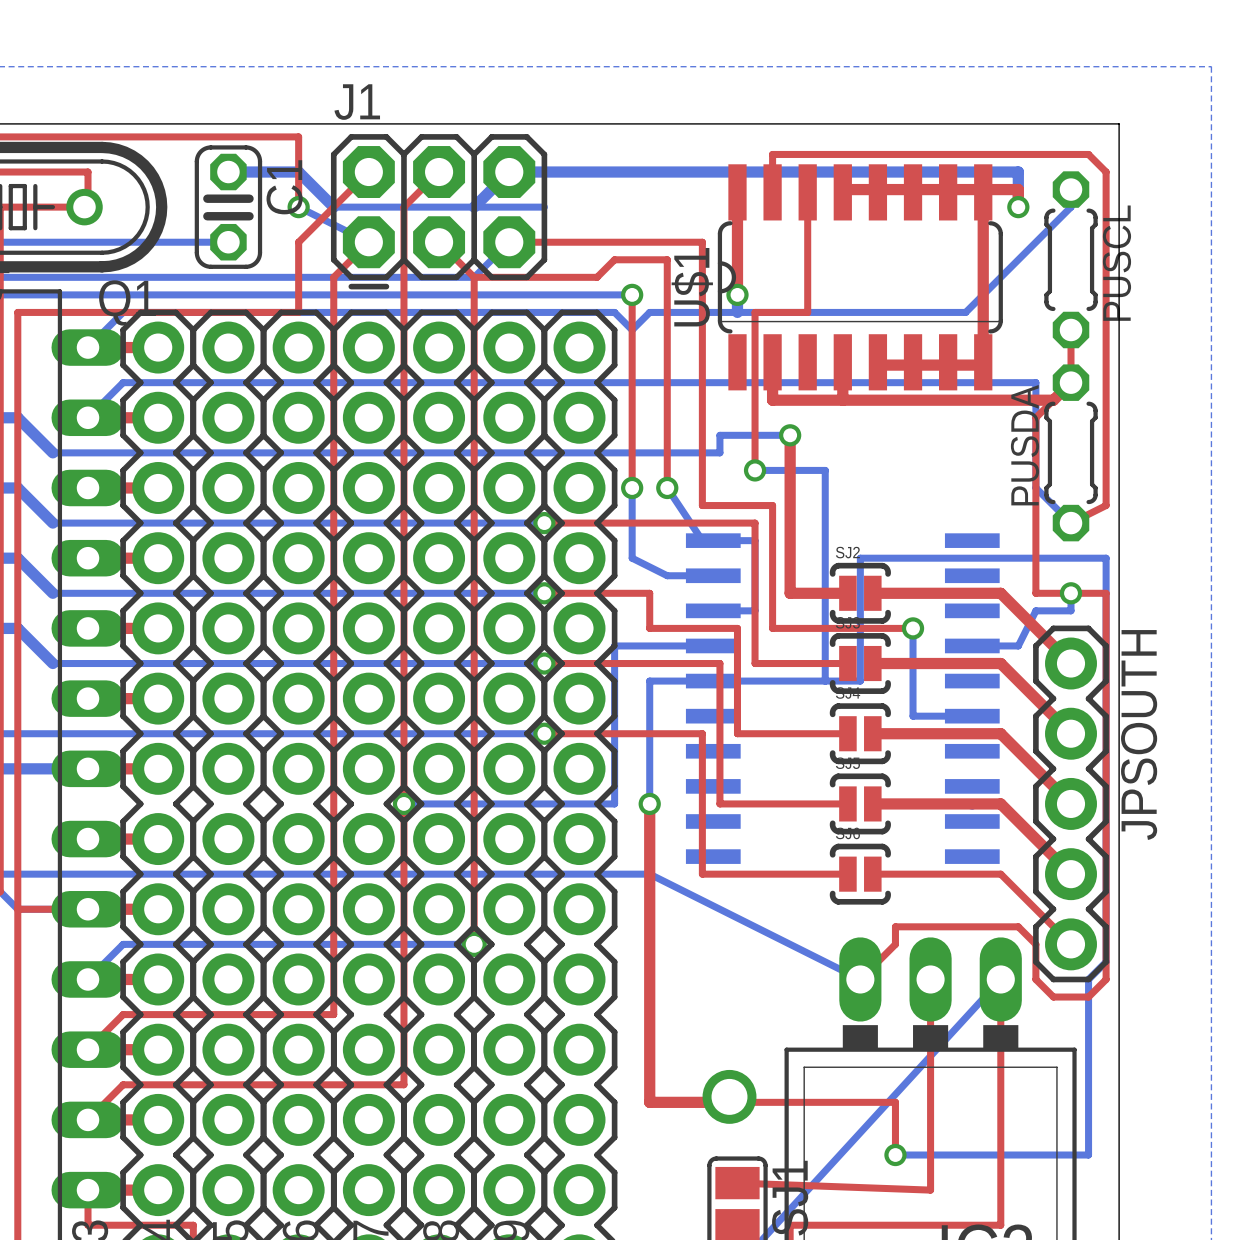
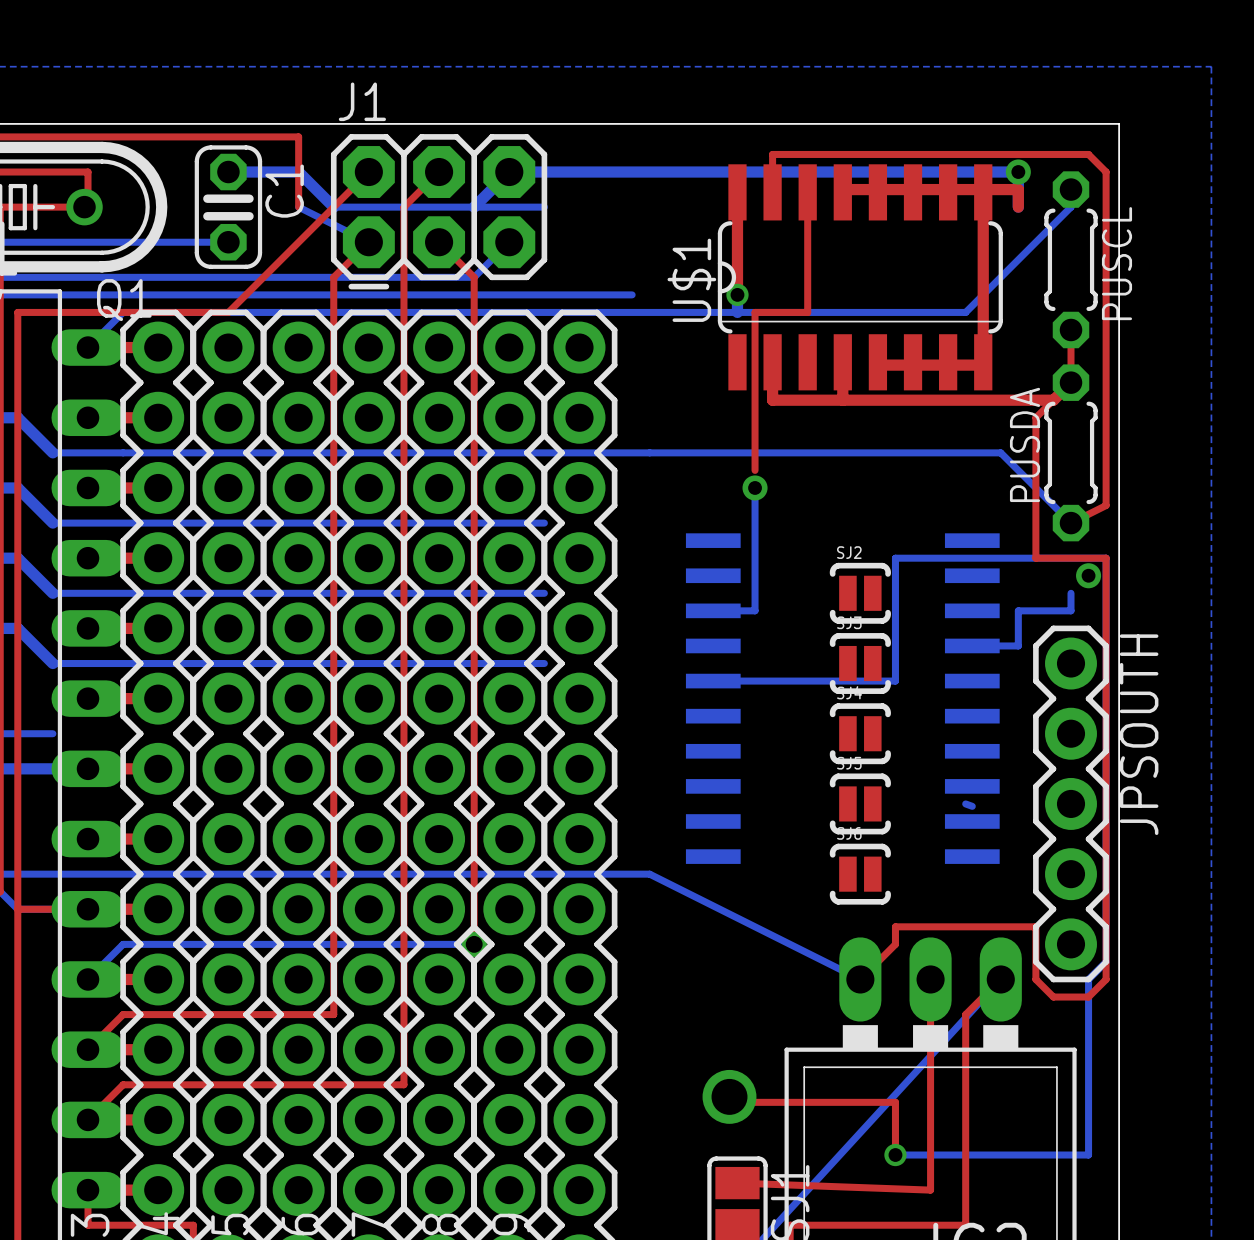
via: none -> (1018, 172)
via: (298, 207) -> none
via: (1018, 207) -> none
top track: (298, 242) (298, 312) (228, 312) -> (298, 242) (228, 312)
top track: (509, 242) (702, 242) (702, 505) (772, 505) (772, 628) (913, 628) -> none
top track: (474, 277) (597, 277) (614, 259) (667, 259) (667, 487) -> none
top track: (632, 294) (632, 487) -> none
via: (632, 294) -> none
bottom track: (614, 312) (632, 330) (649, 312) -> (614, 312) (649, 312)
bottom track: (88, 417) (123, 382) (1035, 382) (1035, 487) -> none
top track: (790, 435) (790, 593) (842, 593) -> none
bottom track: (790, 435) (719, 435) (719, 452) -> (1035, 487) (1000, 452) (719, 452)
via: (790, 435) -> none
bottom track: (755, 470) (825, 470) (825, 681) -> none
via position: (755, 470) -> (755, 487)
bottom track: (632, 487) (632, 558) (667, 575) (719, 575) -> none
via: (632, 487) -> none
bottom track: (667, 487) (702, 540) (755, 540) -> (755, 487) (755, 540)
via: (667, 487) -> none
top track: (544, 523) (755, 523) (755, 663) (842, 663) -> none
via: (544, 523) -> none
bottom track: (895, 558) (860, 558) (860, 681) -> (895, 558) (895, 681) (860, 681)
top track: (1035, 558) (1035, 593) (1106, 593) -> (1035, 558) (1106, 558) (1106, 593)
top track: (544, 593) (649, 593) (649, 628) (737, 628) (737, 733) (842, 733) -> none
via: (544, 593) -> none
top track: (877, 593) (1000, 593) (1071, 663) -> none
via position: (1071, 593) -> (1088, 575)
bottom track: (1035, 610) (1018, 645) -> (1035, 610) (1018, 610) (1018, 645)
bottom track: (913, 628) (913, 716) (965, 716) -> none
via: (913, 628) -> none
bottom track: (702, 645) (614, 645) (614, 803) (403, 803) -> none
top track: (544, 663) (719, 663) (719, 803) (842, 803) -> none
via: (544, 663) -> none
top track: (877, 663) (1000, 663) (1071, 733) -> none
bottom track: (719, 681) (649, 681) (649, 803) -> none
bottom track: (52, 733) (544, 733) -> none
top track: (544, 733) (702, 733) (702, 874) (842, 874) -> none
via: (544, 733) -> none
top track: (877, 733) (1000, 733) (1071, 803) -> none
via: (403, 803) -> none
top track: (649, 803) (649, 1102) (737, 1102) -> none
via: (649, 803) -> none
top track: (877, 803) (1000, 803) (1071, 874) -> none
top track: (877, 874) (1000, 874) (1071, 944) -> none
top track: (1018, 926) (1035, 944) -> (1018, 926) (1035, 926) (1035, 944)
top track: (1000, 979) (1000, 1225) (965, 1225) -> (1000, 979) (965, 1014) (965, 1225)

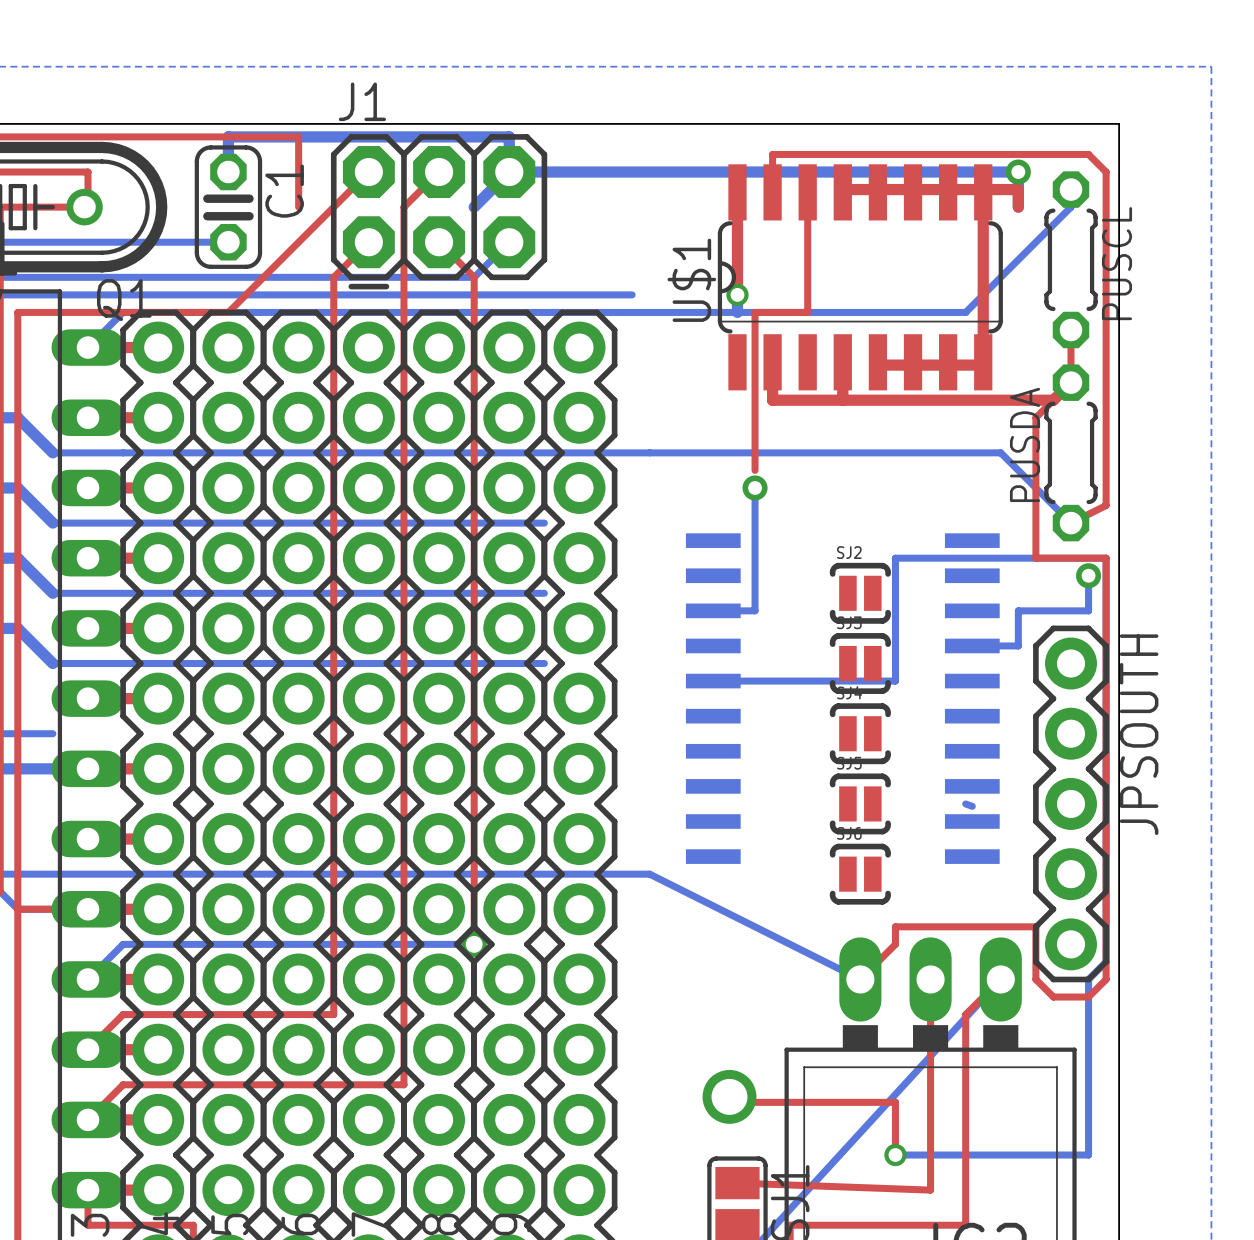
bottom track: (228, 172) (298, 172) (333, 207) (544, 207) -> (228, 172) (228, 136) (509, 136) (509, 172)
bottom track: (298, 207) (368, 242) -> none
bottom track: (1071, 593) (1071, 610) -> (1088, 575) (1088, 610) (1071, 610)

